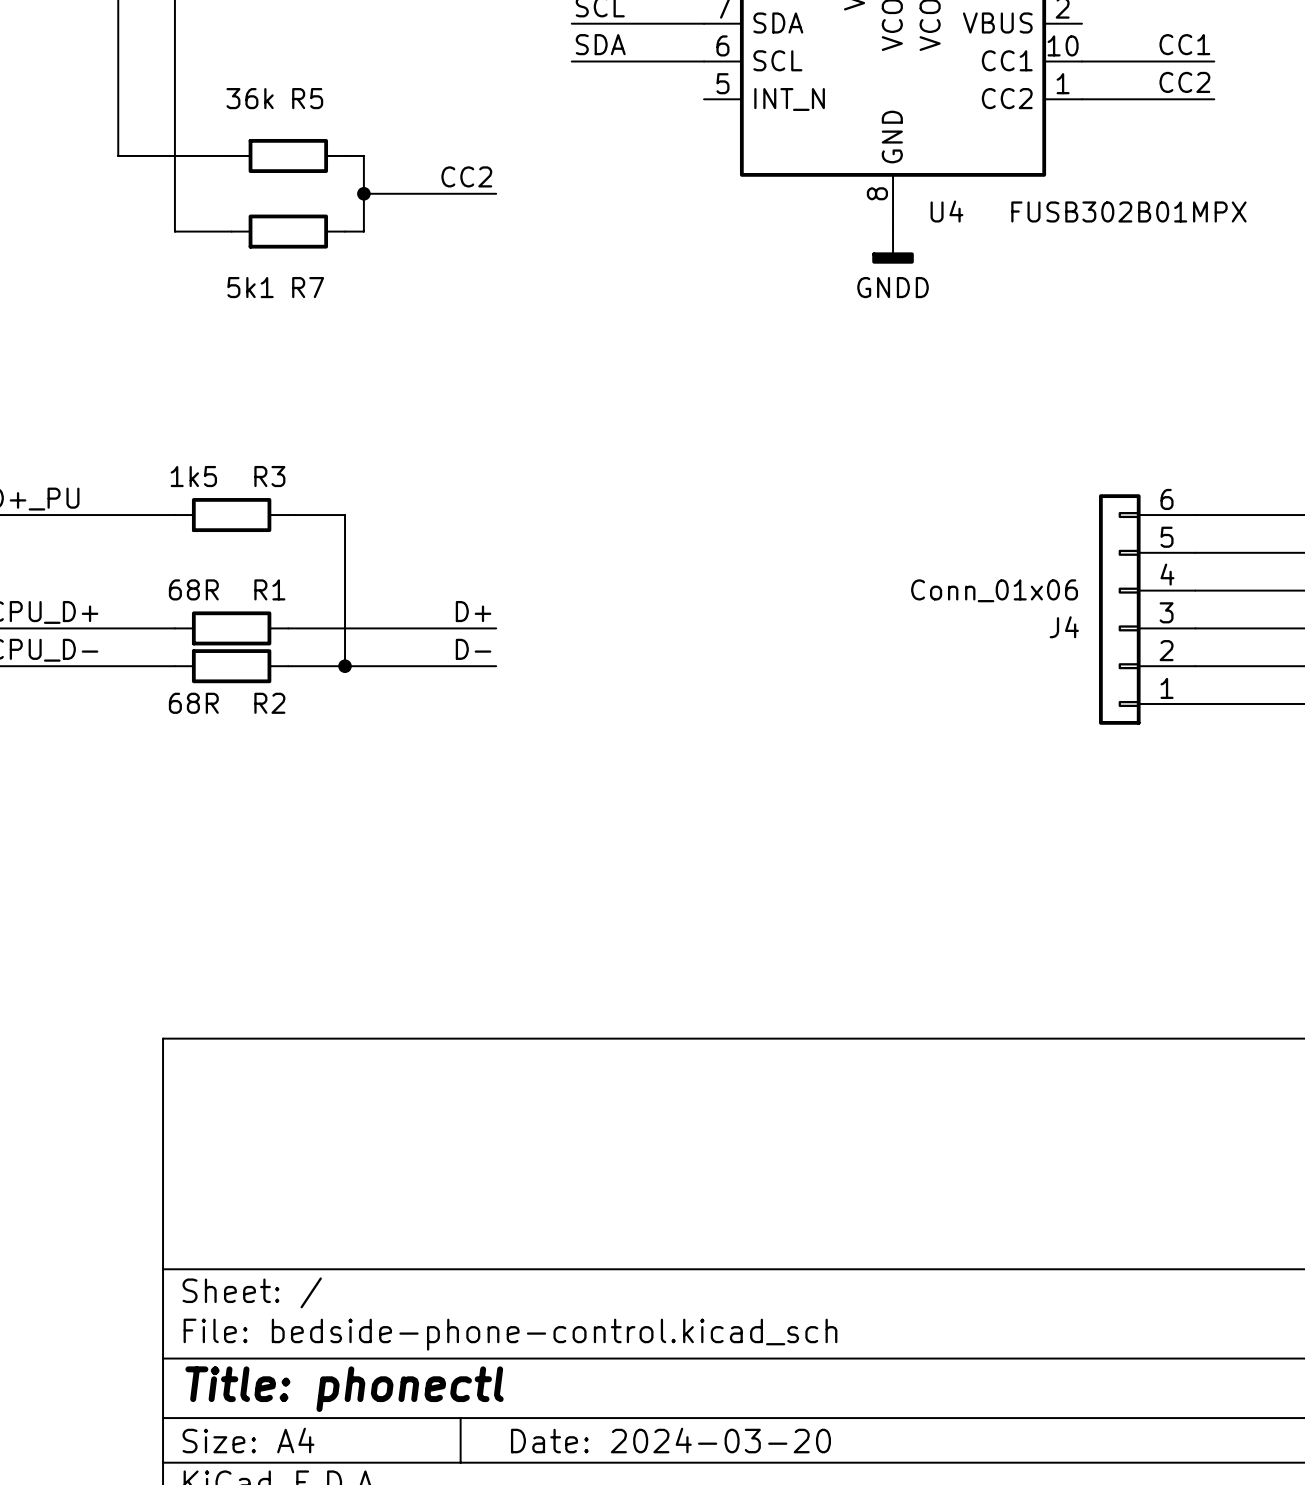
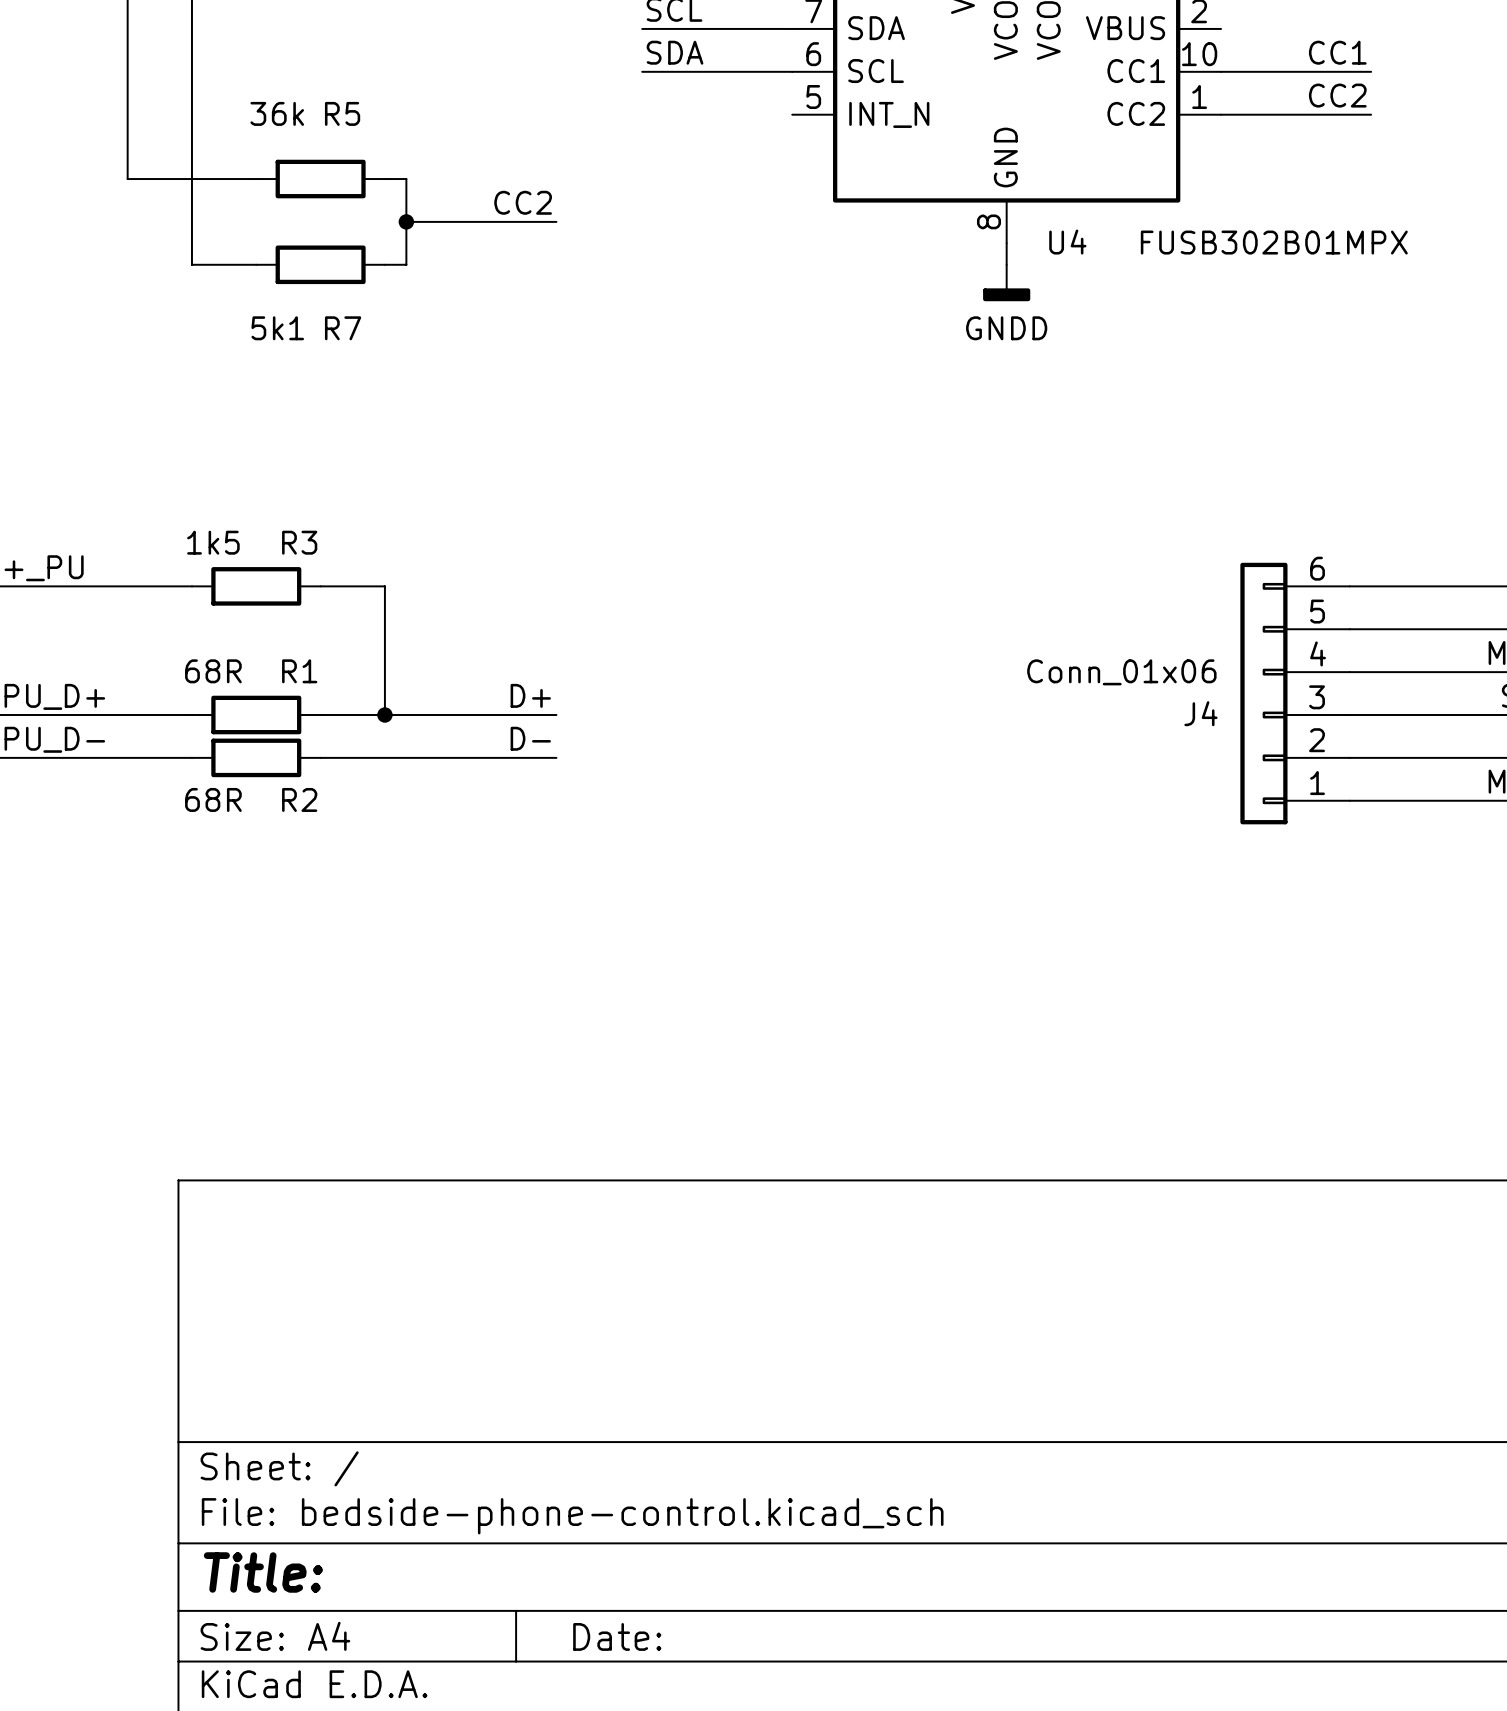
wire: (345, 628) (345, 666) -> none
junction position: (345, 666) -> (384, 715)
title block: Title: phonectl (344, 1389) -> Title: (263, 1572)
title block: Date: 2024-03-20 (670, 1440) -> Date: (617, 1636)

